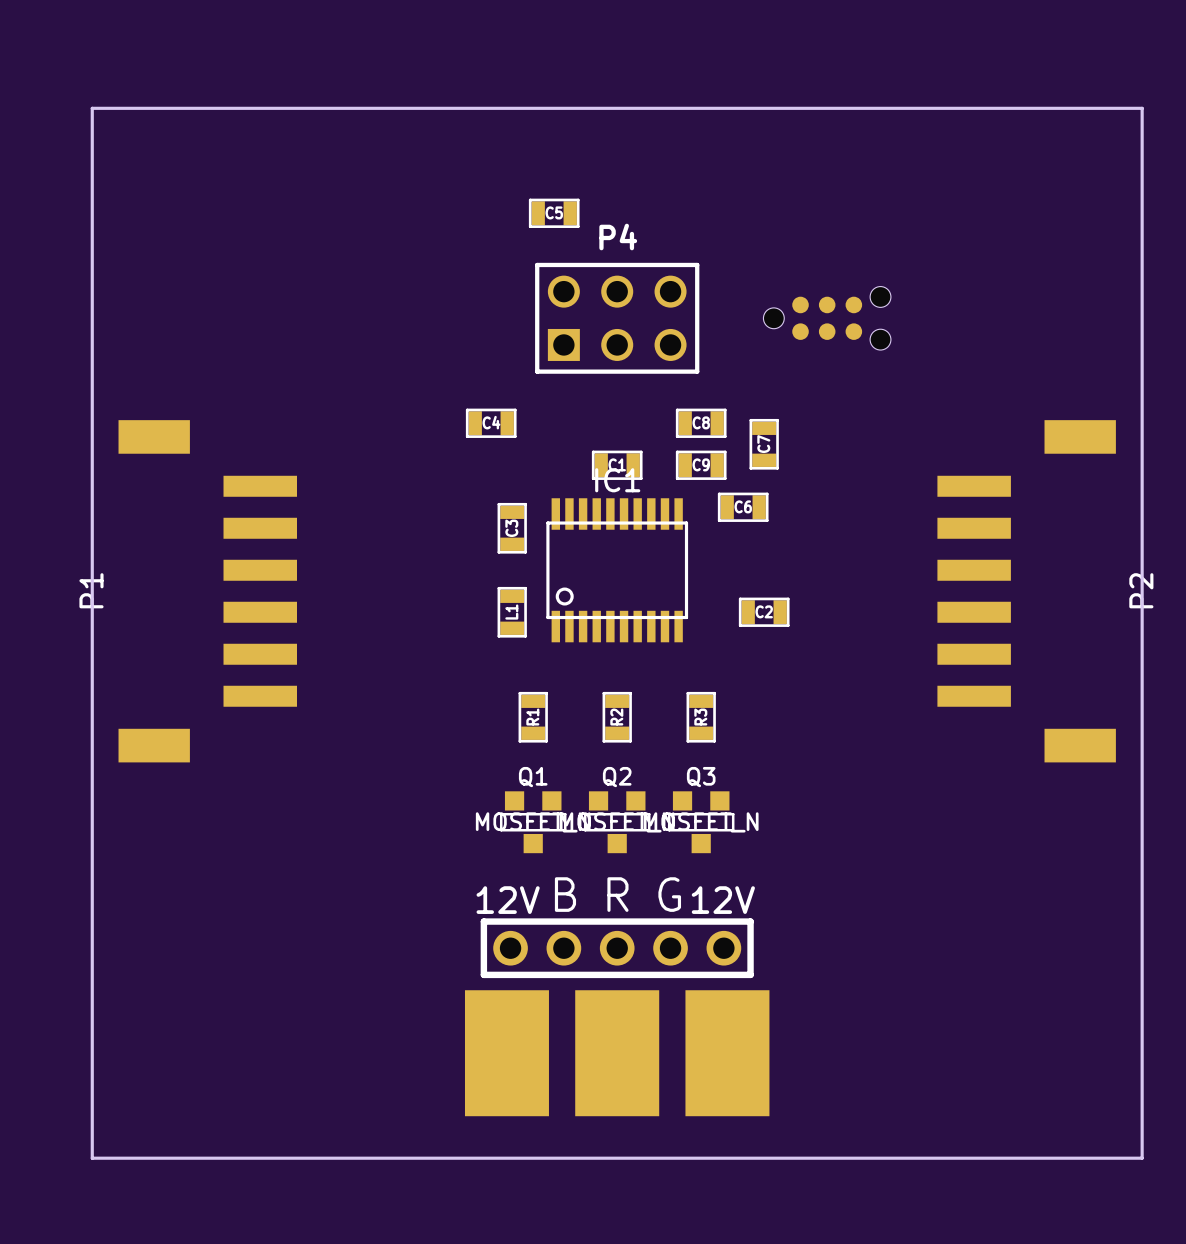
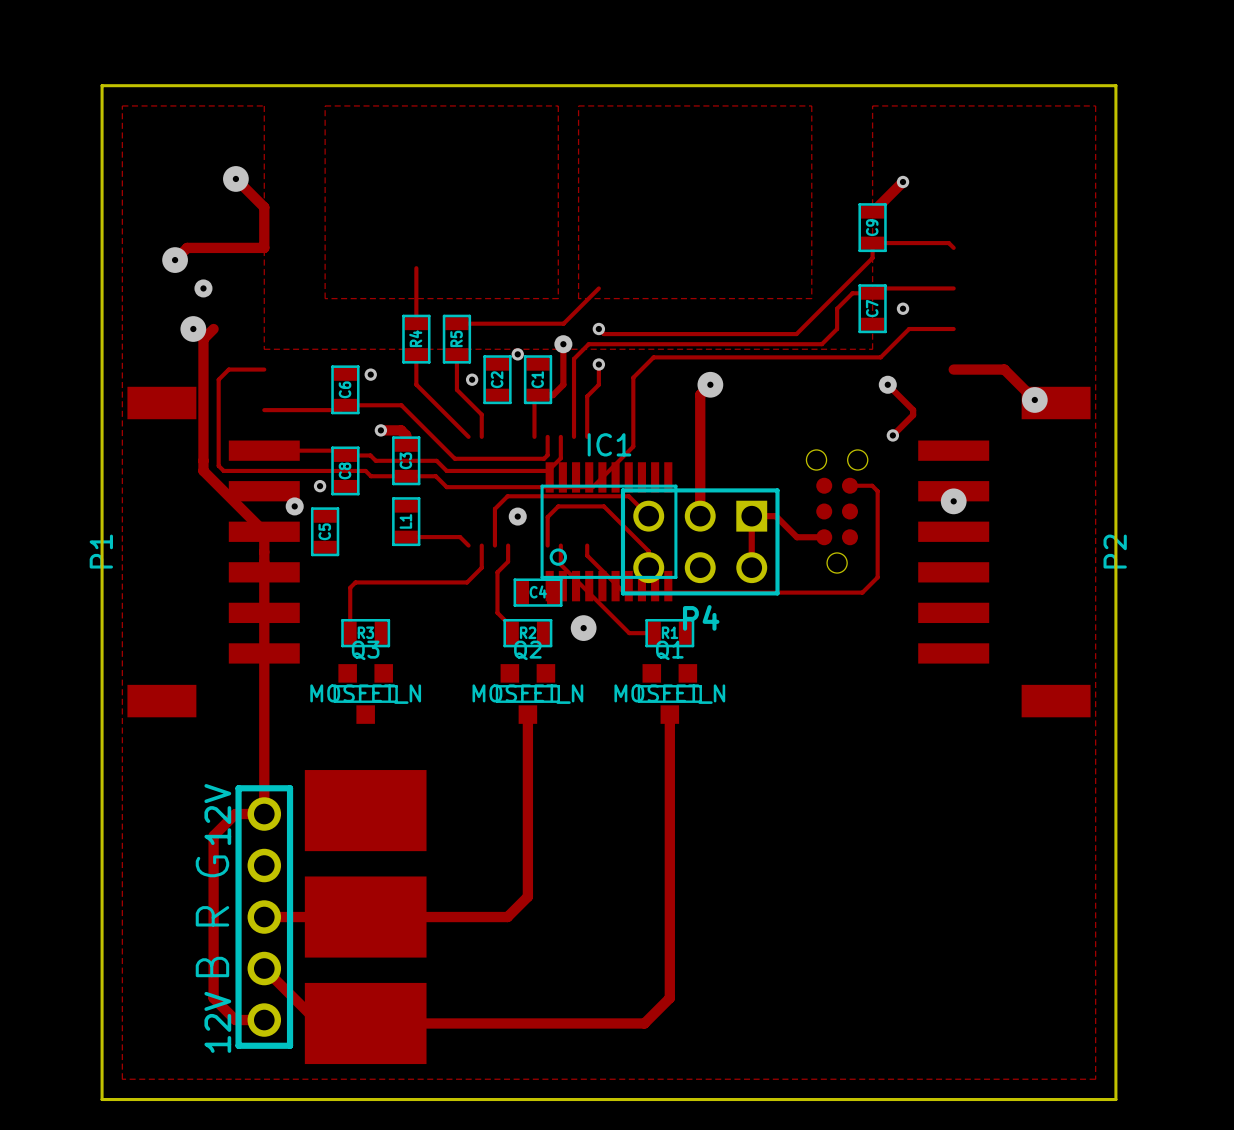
zone outline: none -> (122, 105) (264, 105) (264, 349) (872, 349) (872, 105) (1095, 105) (1095, 1079) (122, 1079) (122, 105)
zone outline: none -> (325, 105) (325, 298) (558, 298) (558, 105) (325, 105)
zone outline: none -> (578, 105) (811, 105) (811, 298) (578, 298) (578, 105)
track: none -> (235, 178) (264, 207) (264, 247) (187, 247) (175, 260)
via: none -> (235, 178)
track: none -> (903, 182) (872, 212)
via: none -> (903, 182)
C5 rotation: 0° (554, 213) -> 90° clockwise (325, 531)
C5 position: (554, 213) -> (325, 531)
track: none -> (953, 247) (948, 243) (872, 243) (872, 258) (796, 334) (603, 334) (598, 329)
via: none -> (175, 260)
track: none -> (416, 268) (416, 323)
via: none -> (203, 288)
track: none -> (598, 288) (563, 323) (456, 323)
P4 rotation: 0° (617, 318) -> 180° (700, 541)
P4 position: (617, 318) -> (700, 541)
part rotation: 0° (827, 318) -> 90° counterclockwise (837, 511)
part position: (827, 318) -> (837, 511)
track: none -> (953, 288) (877, 288) (872, 293) (852, 293) (837, 308) (837, 329) (821, 344) (588, 344) (574, 358) (574, 436)
via: none -> (903, 308)
via: none -> (193, 329)
track: none -> (213, 329) (203, 339) (203, 470) (264, 531) (264, 814) (235, 814) (213, 835) (213, 998) (235, 1020) (264, 1020)
via: none -> (598, 329)
track: none -> (953, 329) (909, 329) (880, 357) (653, 357) (633, 377) (633, 446) (592, 487) (446, 487) (435, 476) (370, 476) (365, 470) (223, 470) (218, 465) (218, 379) (228, 369) (264, 369)
R4: none -> (416, 339)
R5: none -> (456, 339)
track: none -> (563, 344) (563, 384) (552, 395) (538, 395) (534, 398) (534, 436)
via: none -> (563, 344)
track: none -> (416, 354) (416, 384) (468, 436)
track: none -> (456, 354) (456, 389) (481, 414) (481, 436)
via: none -> (517, 354)
track: none -> (598, 364) (598, 384) (587, 396) (587, 436)
via: none -> (598, 364)
track: none -> (953, 369) (1004, 369) (1034, 399)
via: none -> (370, 374)
via: none -> (472, 379)
track: none -> (710, 384) (700, 394) (700, 516)
via: none -> (710, 384)
track: none -> (887, 384) (913, 410) (913, 415) (892, 435)
via: none -> (887, 384)
C4 position: (491, 423) -> (538, 592)
C8 rotation: 0° (701, 423) -> 90° clockwise (345, 470)
C8 position: (701, 423) -> (345, 470)
via: none -> (1034, 399)
track: none -> (264, 410) (340, 410) (345, 405) (401, 405) (454, 458) (544, 458) (547, 455) (547, 436)
C7 position: (764, 444) -> (872, 308)
track: none -> (380, 430) (401, 430) (406, 435) (406, 445)
via: none -> (380, 430)
C1 rotation: 0° (617, 465) -> 90° clockwise (538, 379)
C1 position: (617, 465) -> (538, 379)
C9 rotation: 0° (701, 465) -> 90° clockwise (872, 227)
C9 position: (701, 465) -> (872, 227)
via: none -> (892, 435)
track: none -> (560, 436) (560, 458) (548, 470) (446, 470) (436, 460) (375, 460) (370, 455) (345, 455) (340, 450) (264, 450)
C6 rotation: 0° (743, 507) -> 90° clockwise (345, 389)
C6 position: (743, 507) -> (345, 389)
track: none -> (849, 485) (872, 485) (877, 491) (877, 577) (862, 592) (624, 592) (587, 555) (587, 545)
via: none -> (320, 486)
C3 position: (512, 528) -> (406, 460)
via: none -> (953, 501)
via: none -> (294, 506)
via: none -> (517, 516)
track: none -> (648, 516) (628, 496) (507, 496) (494, 508) (494, 545)
track: none -> (406, 537) (460, 537) (468, 545)
track: none -> (824, 537) (796, 537) (775, 516) (751, 516) (751, 567)
track: none -> (481, 545) (481, 567) (467, 582) (355, 582) (350, 587) (350, 633)
track: none -> (508, 545) (508, 561) (497, 572) (497, 612) (512, 627) (512, 633)
track: none -> (547, 545) (547, 517) (558, 506) (603, 506) (648, 551) (648, 567)
track: none -> (560, 545) (560, 564) (629, 633) (654, 633)
L1 position: (512, 612) -> (406, 521)
C2 rotation: 0° (764, 612) -> 90° clockwise (497, 379)
C2 position: (764, 612) -> (497, 379)
via: none -> (583, 628)
R1 rotation: 0° (533, 717) -> 90° clockwise (669, 633)
R1 position: (533, 717) -> (669, 633)
R2 rotation: 0° (617, 717) -> 90° clockwise (527, 633)
R2 position: (617, 717) -> (527, 633)
R3 rotation: 0° (701, 717) -> 90° clockwise (365, 633)
R3 position: (701, 717) -> (365, 633)
track: none -> (527, 714) (527, 896) (507, 917) (264, 917)
track: none -> (669, 714) (669, 998) (644, 1023) (319, 1023) (264, 968)
Q1 position: (533, 822) -> (669, 693)
Q2 position: (617, 822) -> (527, 693)
Q3 position: (701, 822) -> (365, 693)
part rotation: 0° (617, 1017) -> 90° counterclockwise (330, 917)
part position: (617, 1017) -> (330, 917)

